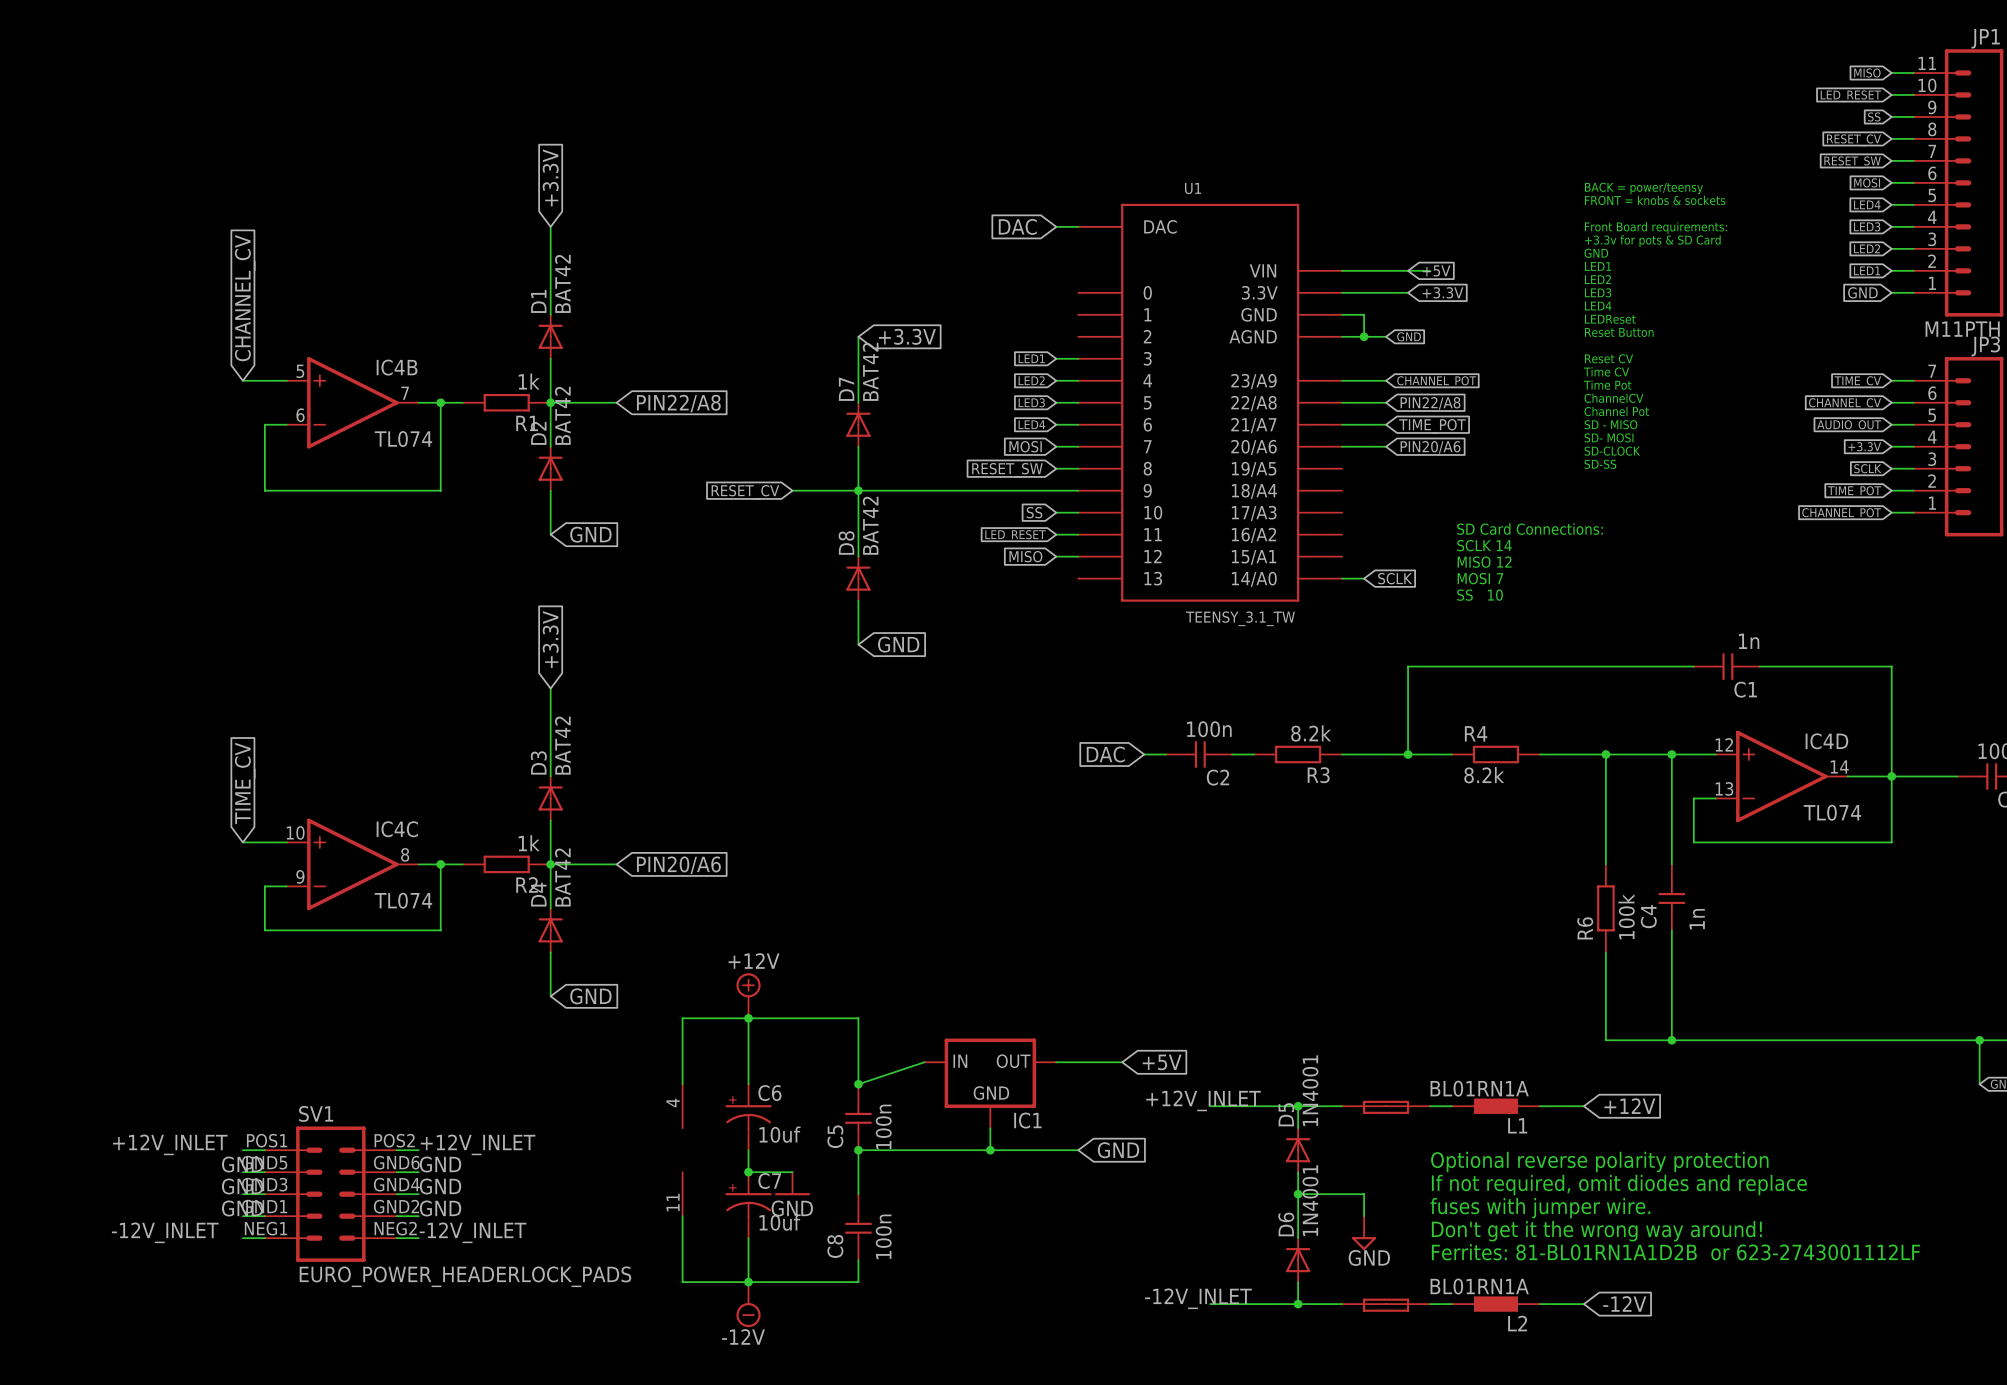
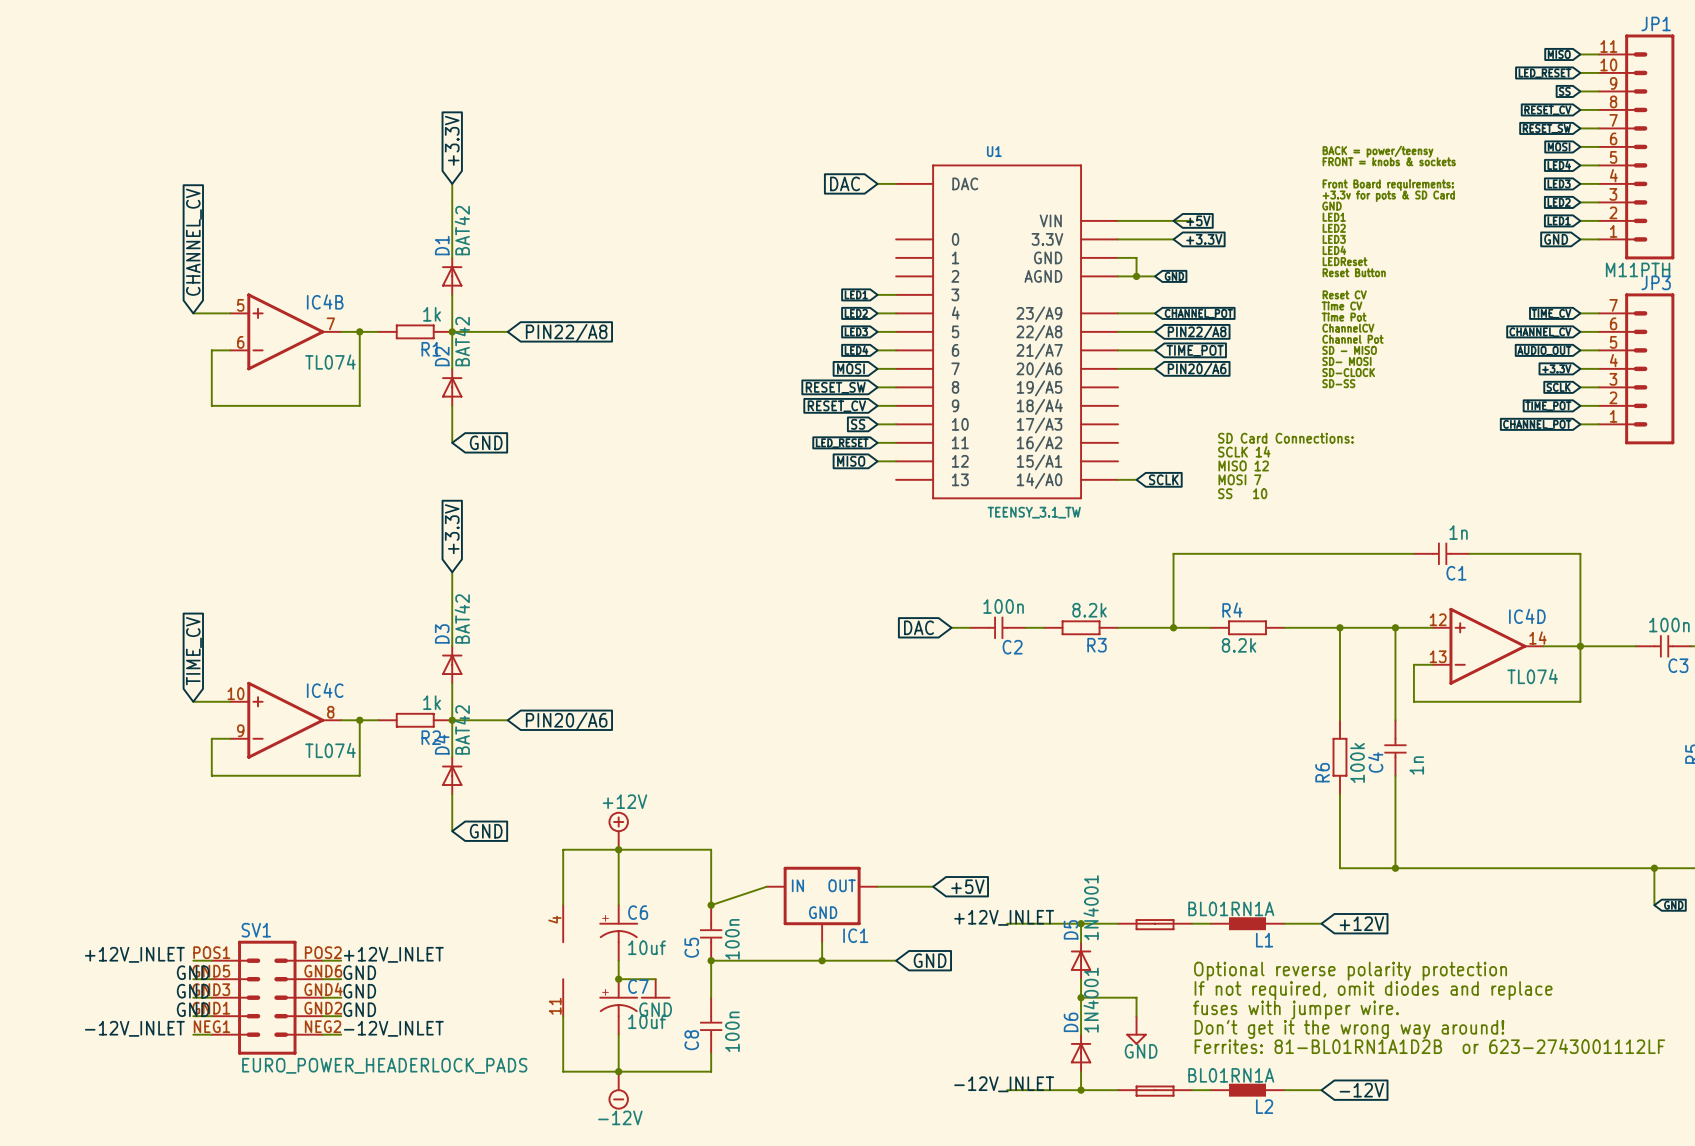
wire: (858, 336) (858, 402) -> none
global label: +3.3V (907, 336) -> none
D7: BAT42 (858, 424) -> none
wire: (858, 446) (858, 556) -> none
wire: (792, 490) (1056, 490) -> none
junction: (858, 490) -> none
global label: RESET_CV (745, 492) -> none
global label: none -> RESET_CV (836, 406)
D8: BAT42 (858, 578) -> none
wire: (858, 600) (858, 644) -> none
global label: GND (898, 644) -> none

